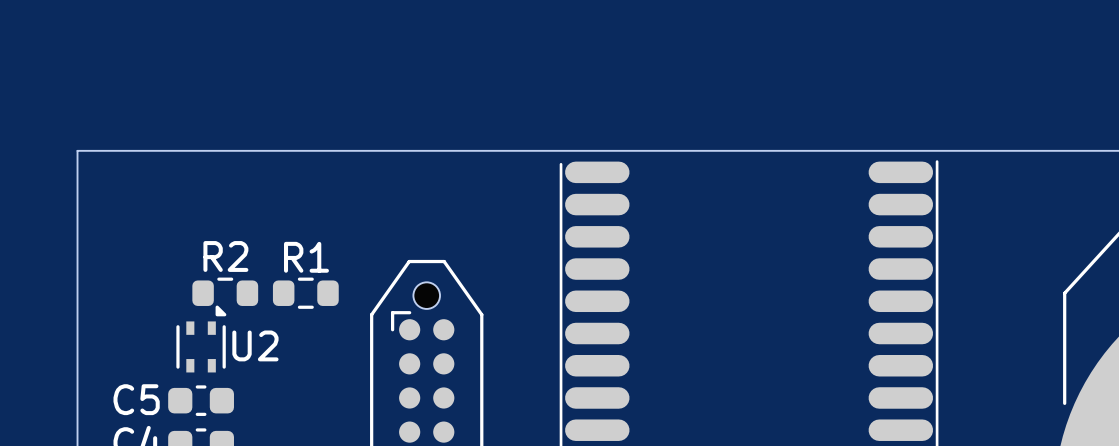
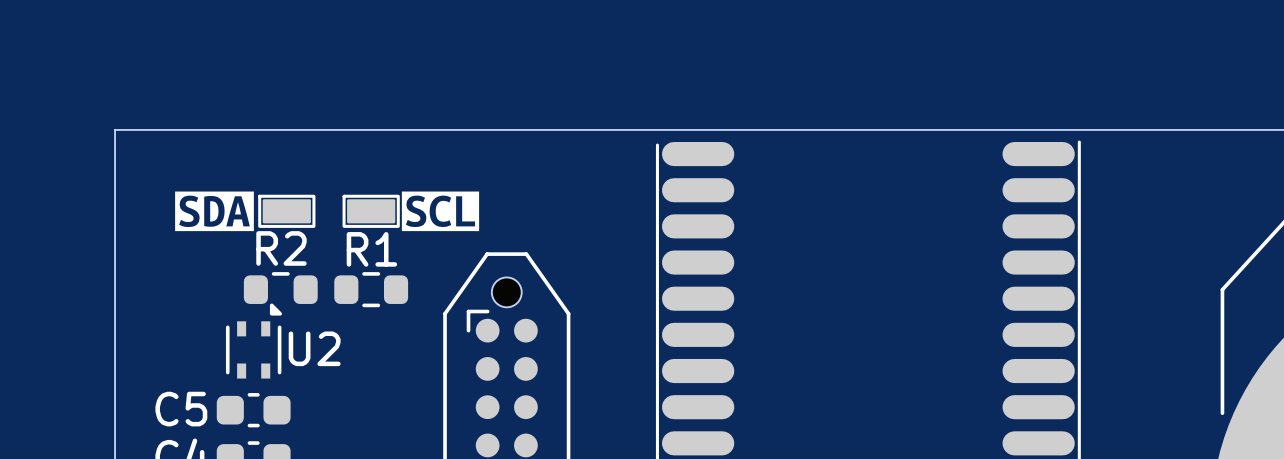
drawing: none -> [175, 191, 254, 232]
drawing: none -> [401, 191, 480, 232]
part: none -> (286, 211)
part: none -> (371, 211)

